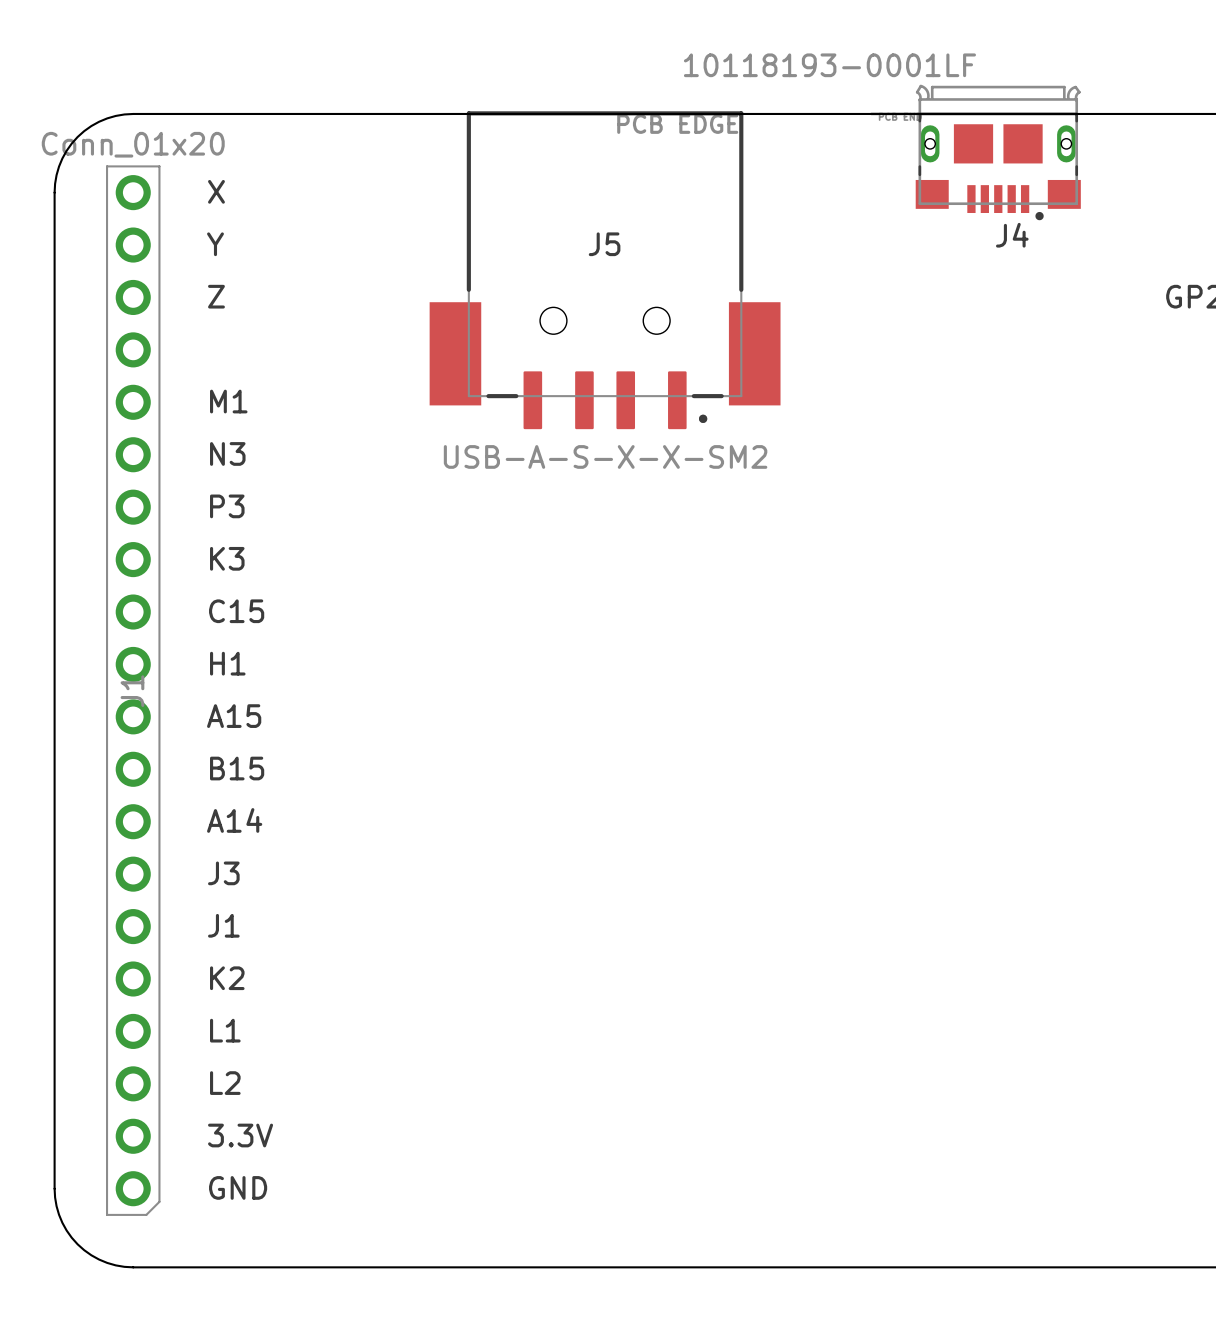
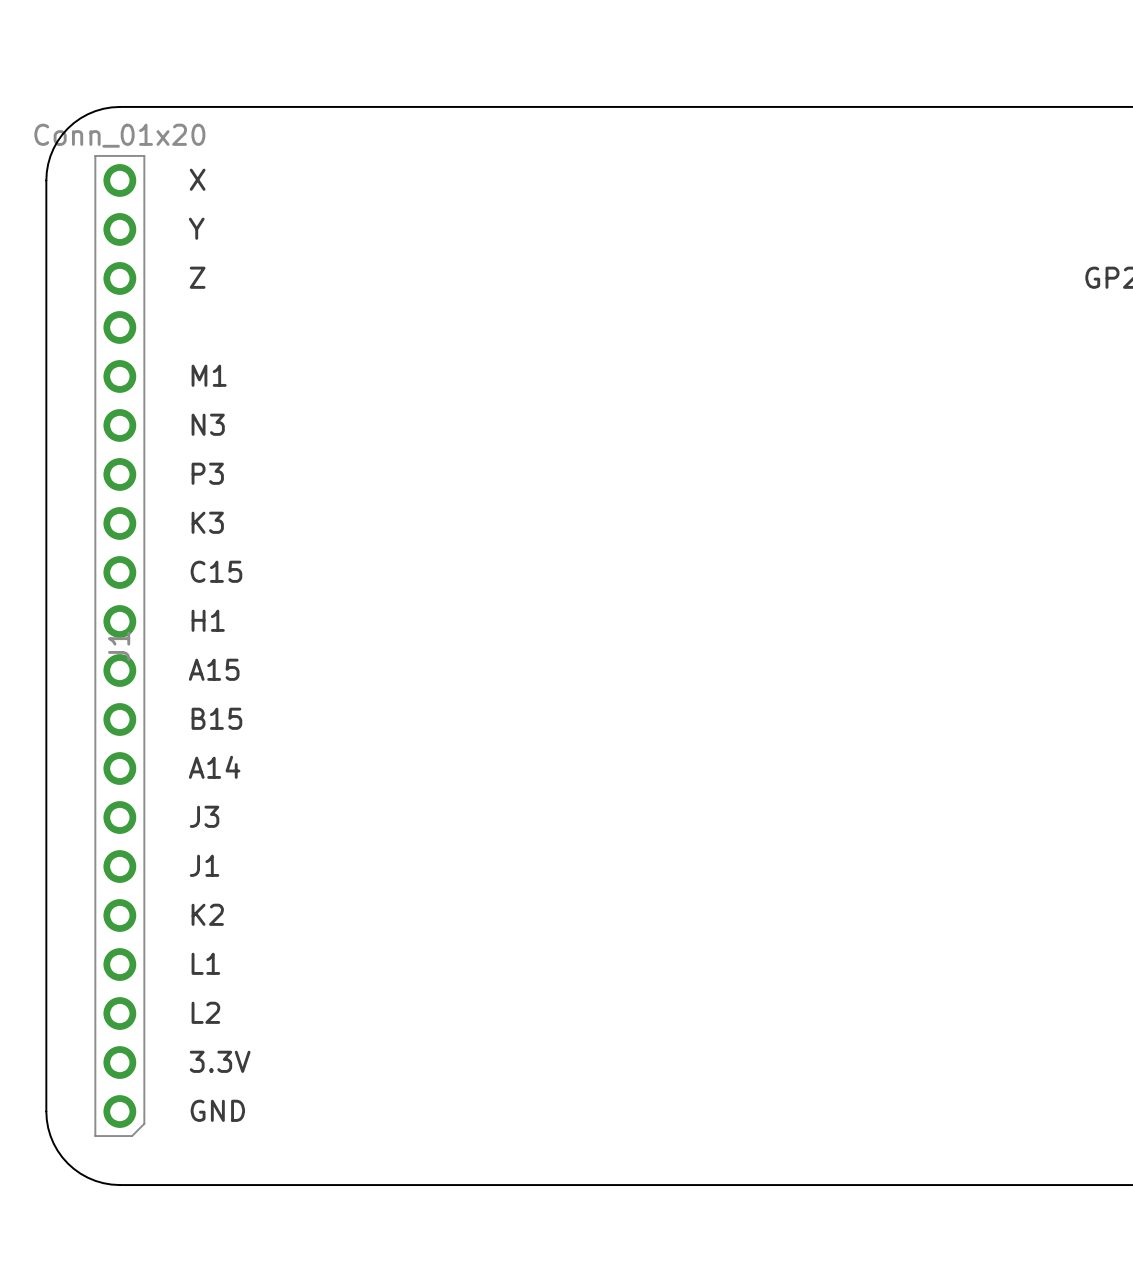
J4: 10118193-0001LF (975, 152) -> none
J5: USB-A-S-X-X-SM2 (605, 270) -> none

